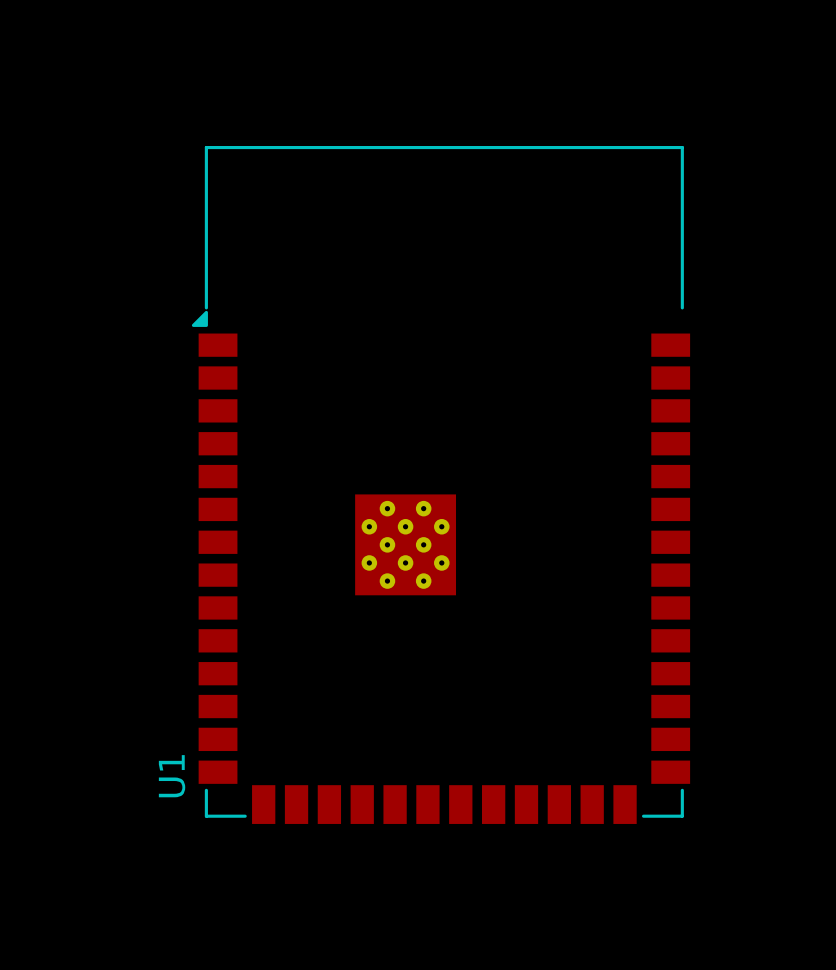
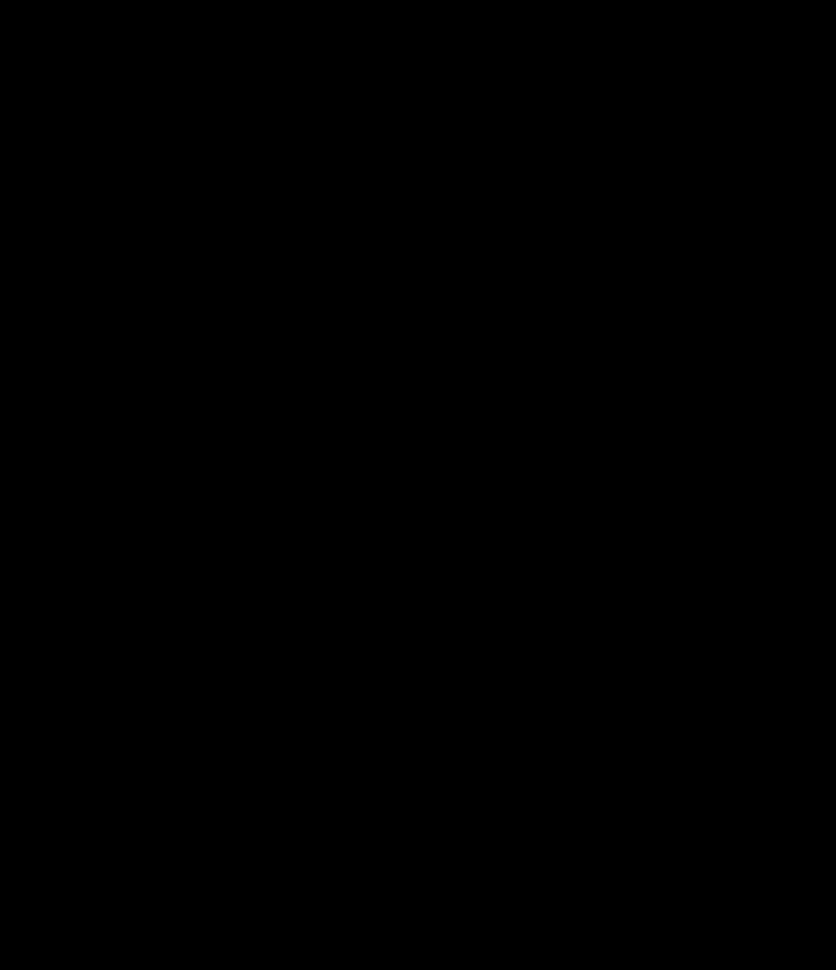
U1: (441, 484) -> none

